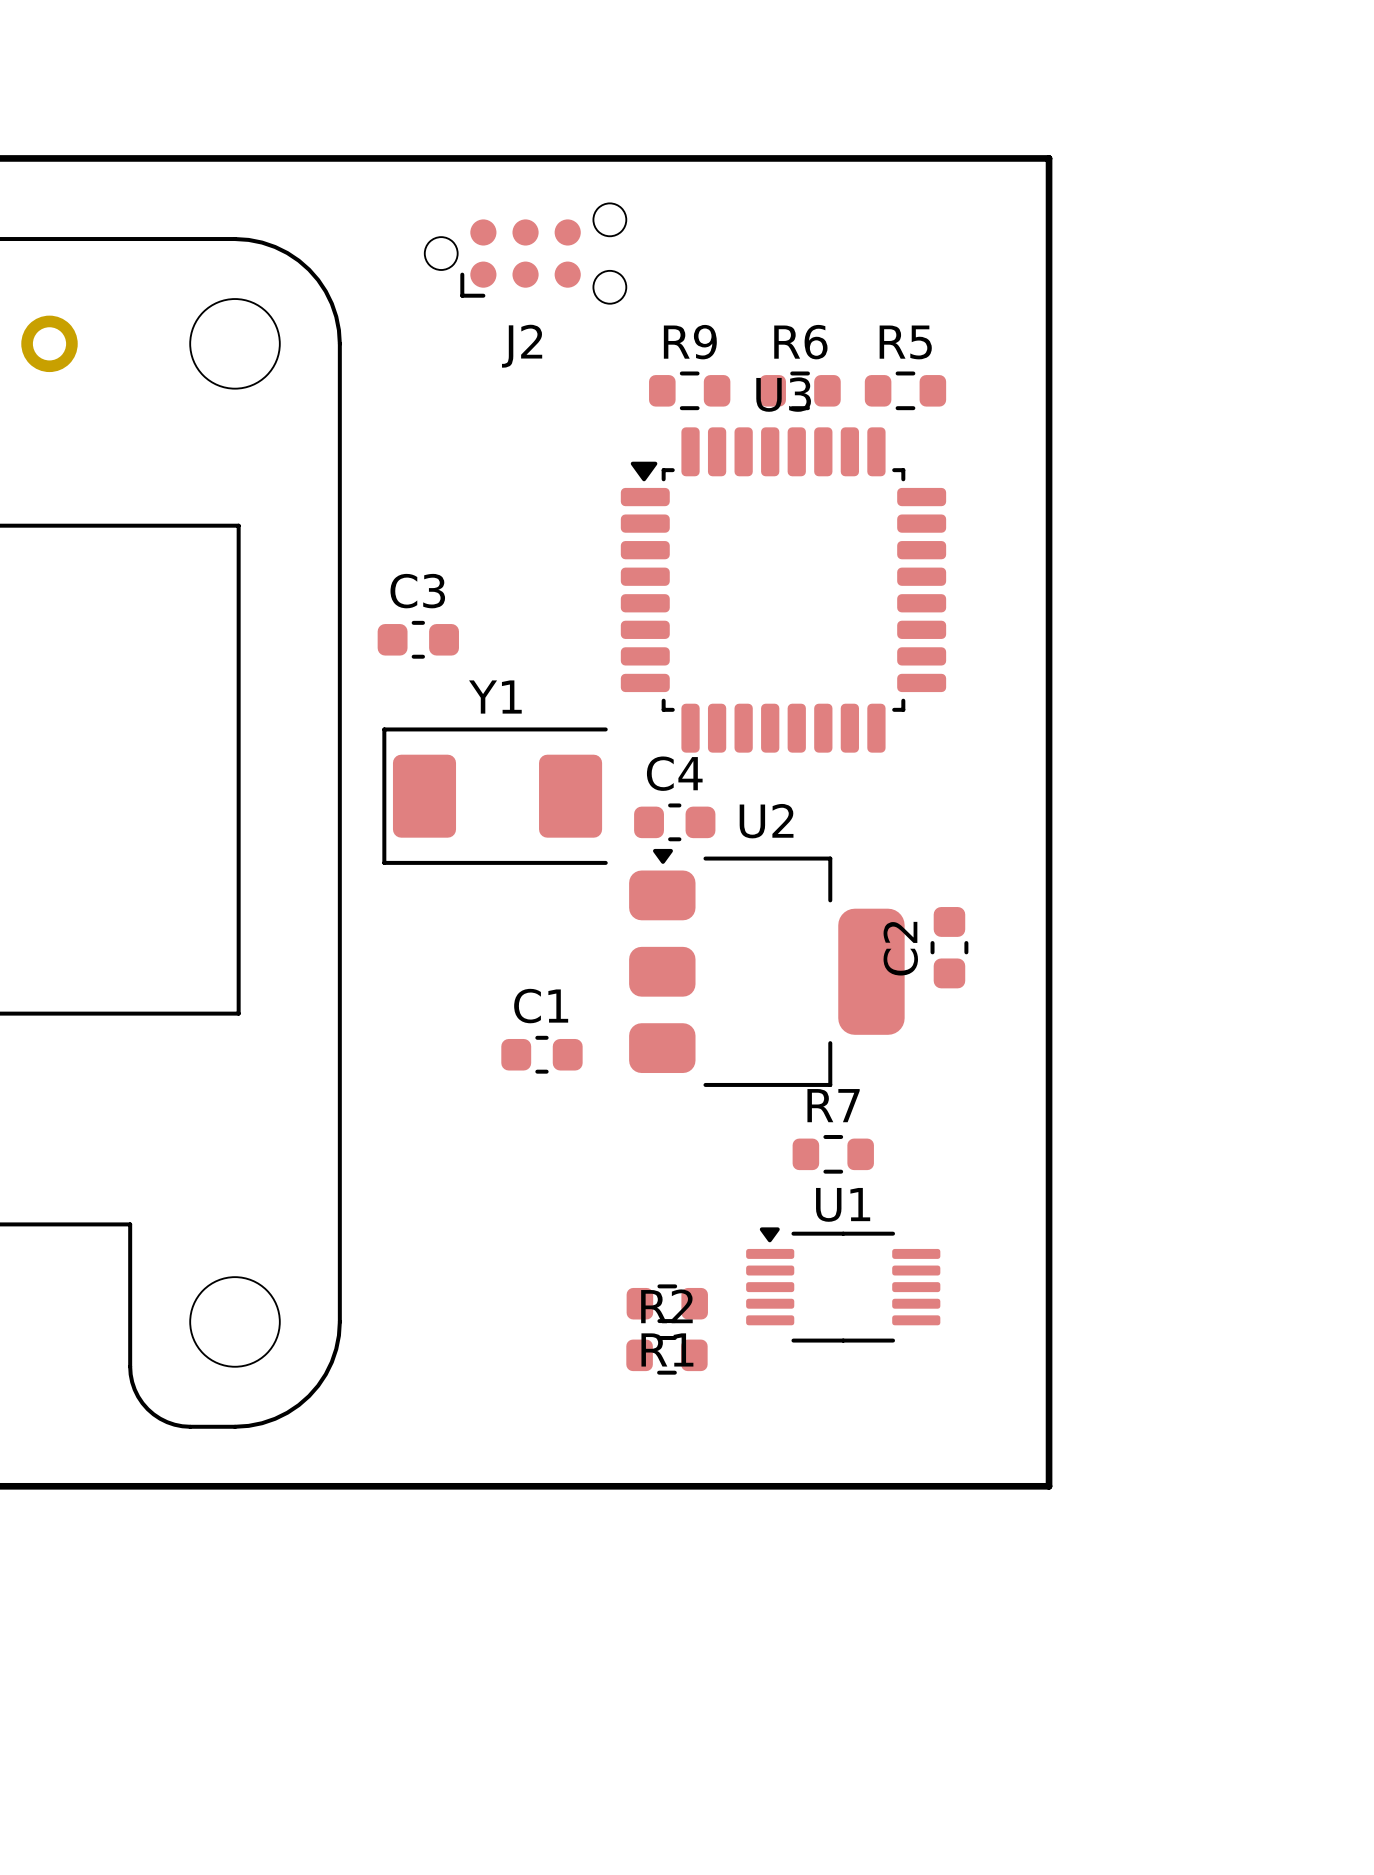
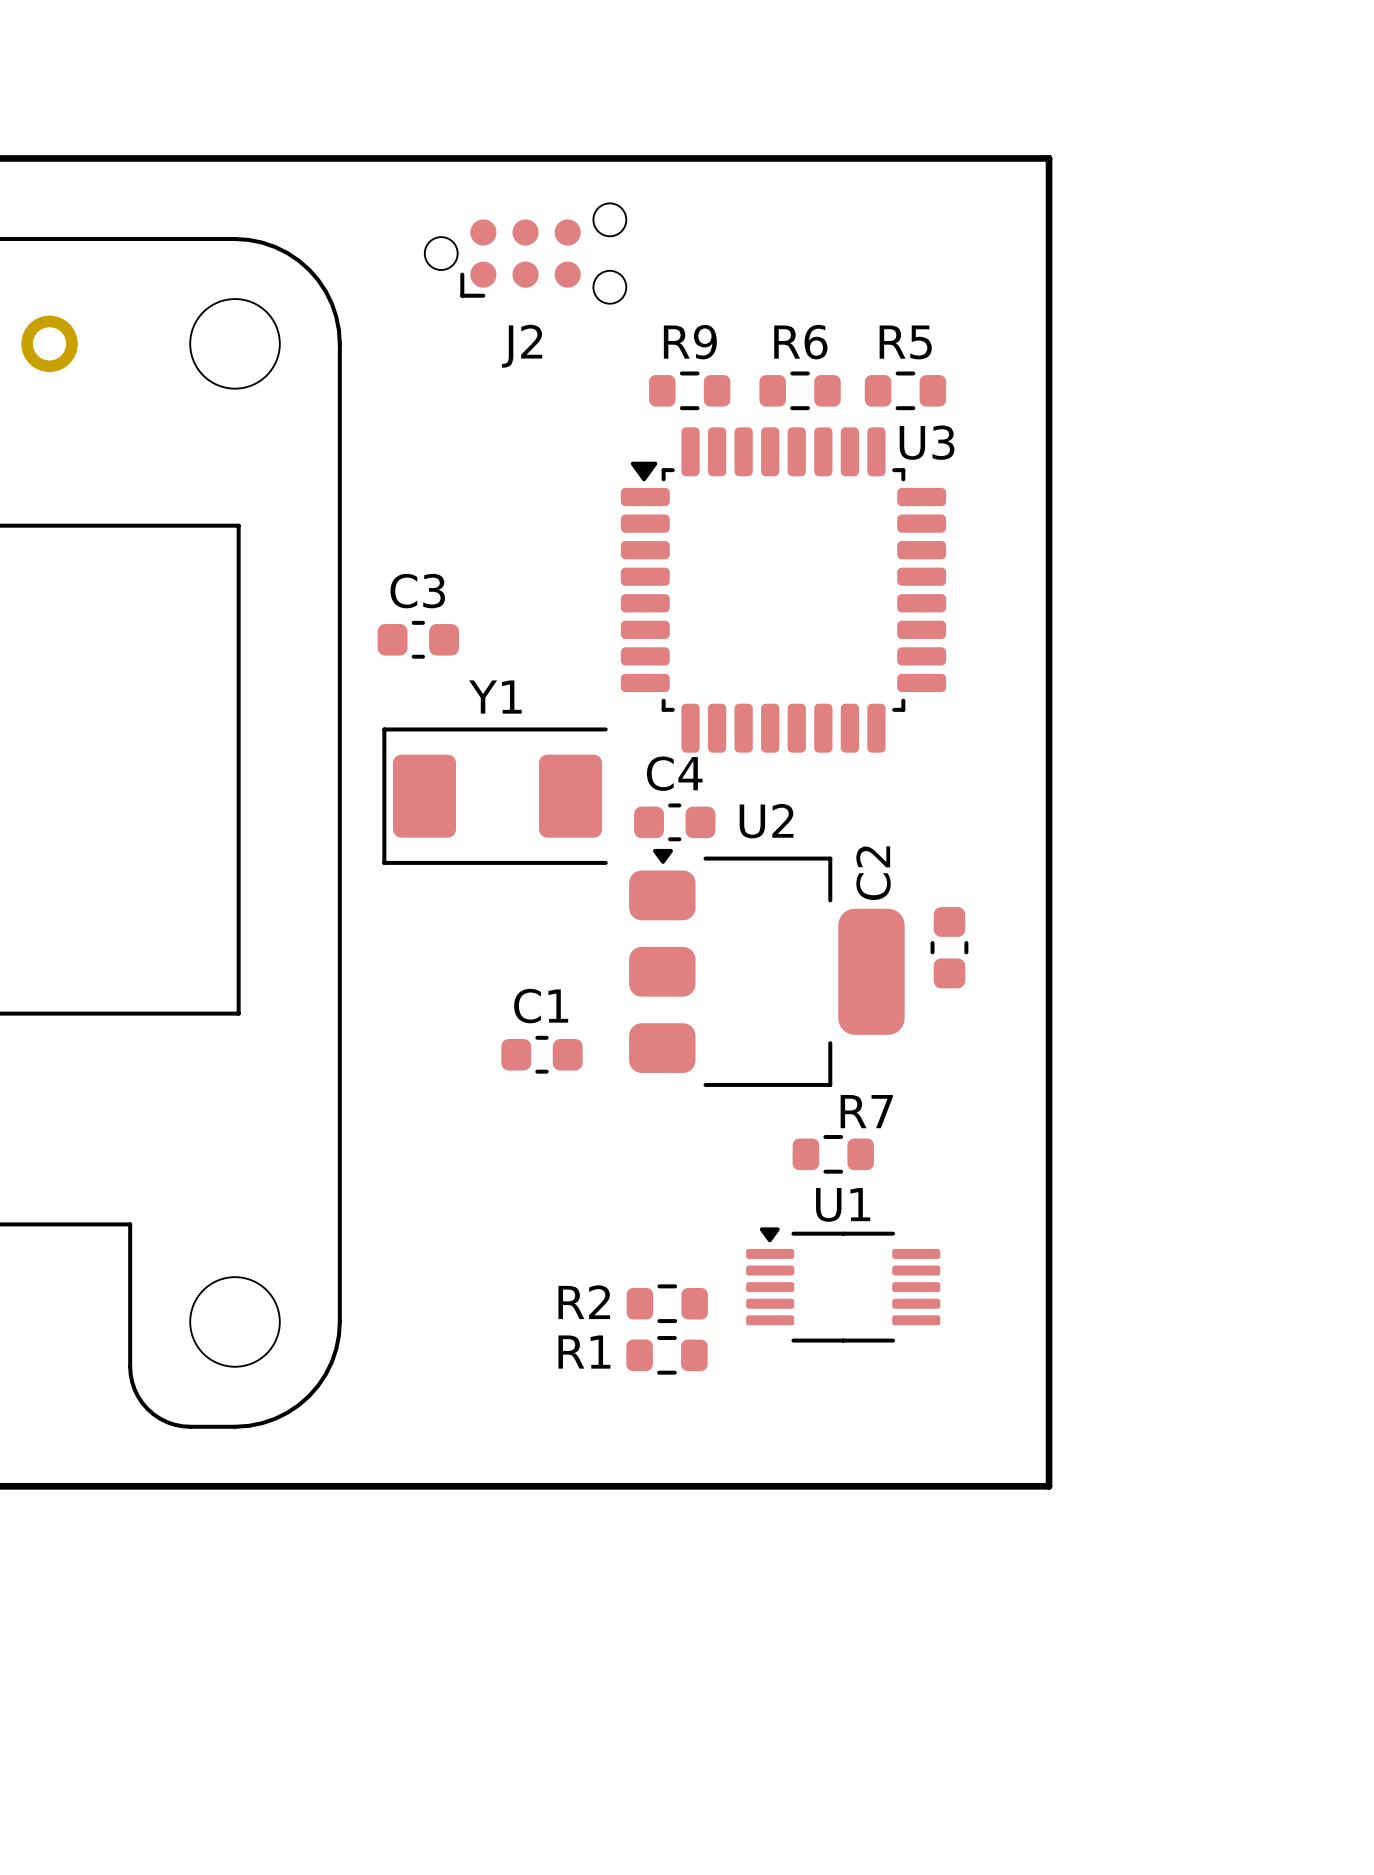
U3 name position: U3 (783, 394) -> U3 (927, 442)
C2 name position: C2 (900, 948) -> C2 (873, 873)
R7 name position: R7 (833, 1105) -> R7 (866, 1111)
R2 name position: R2 (666, 1306) -> R2 (584, 1302)
R1 name position: R1 (667, 1349) -> R1 (584, 1352)

